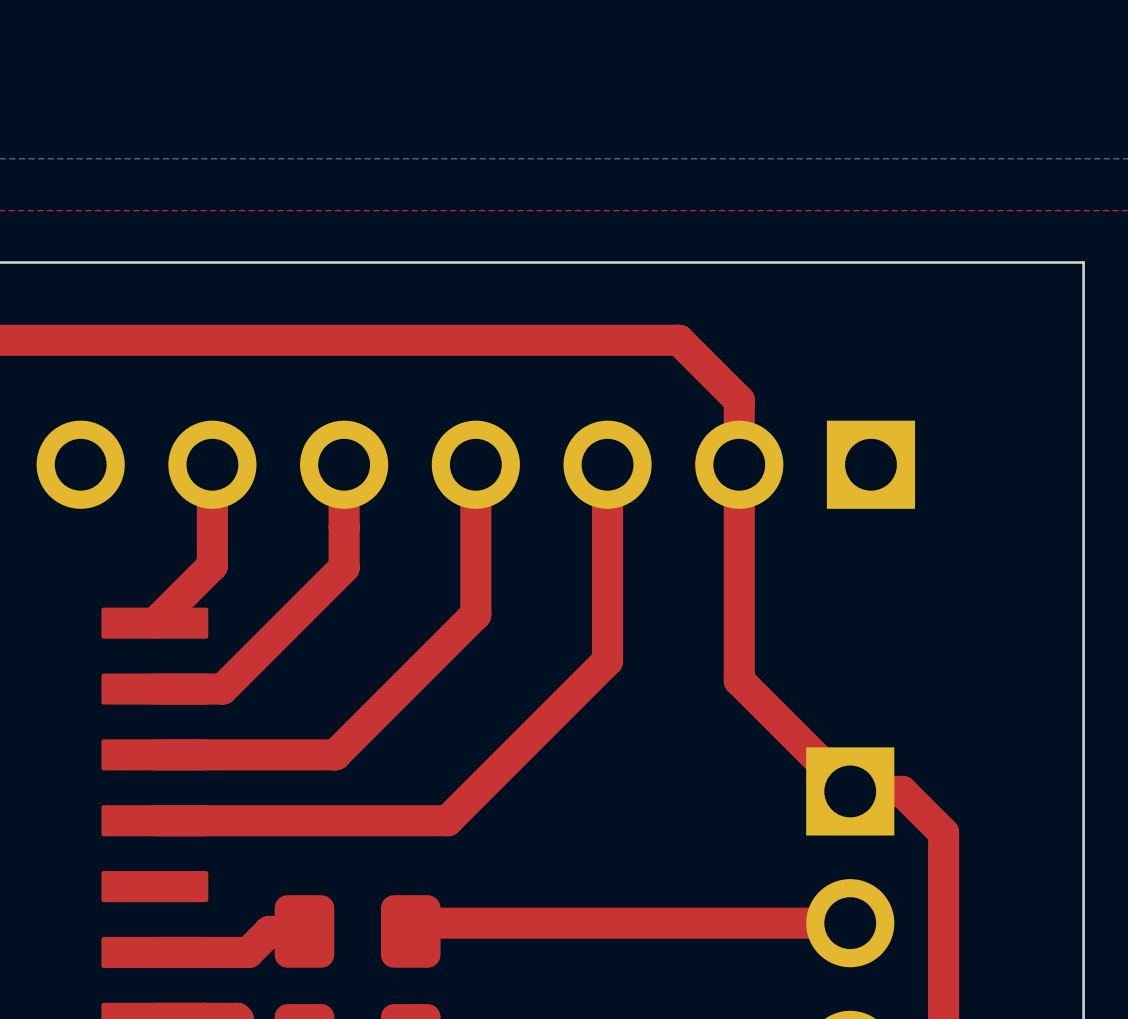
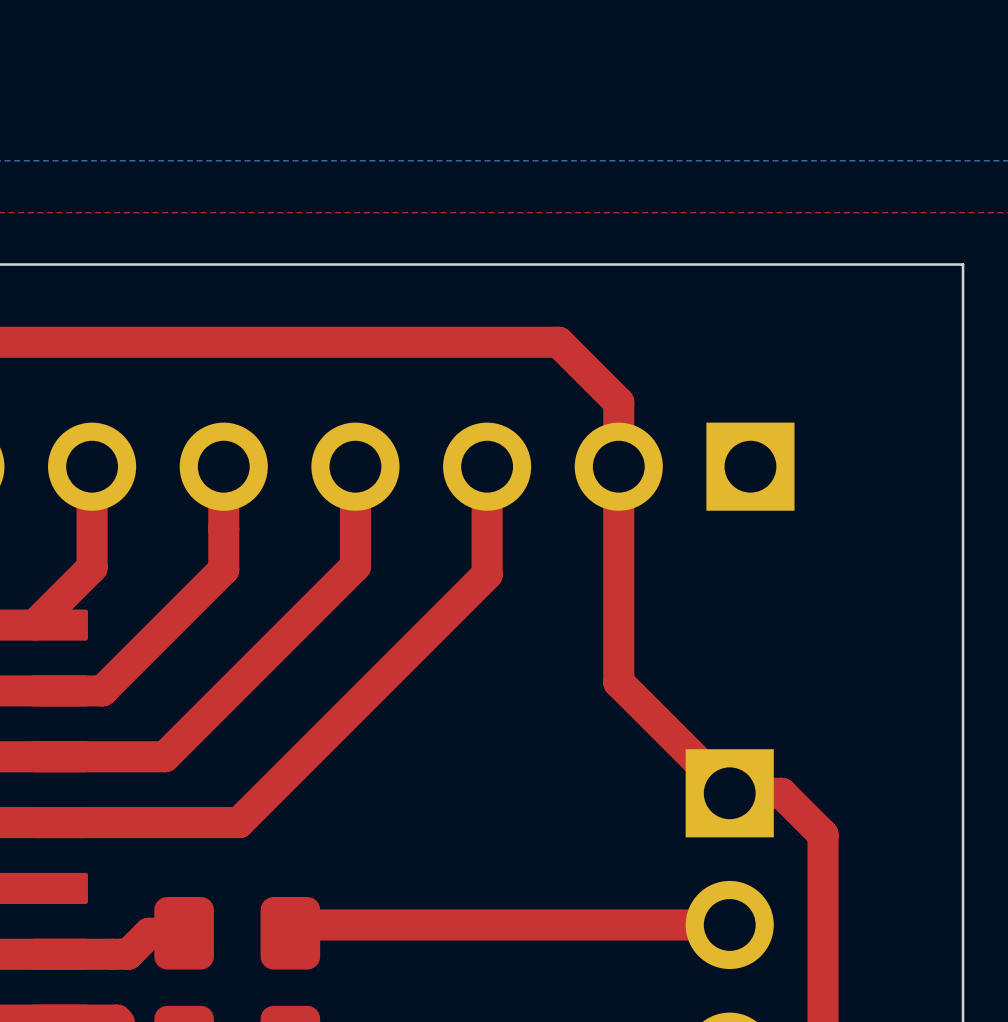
top track: (475, 564) (475, 614) (335, 754) (285, 754) -> (355, 566) (164, 756)
top track: (607, 572) (607, 660) (447, 820) (359, 820) -> (487, 574) (239, 822)

